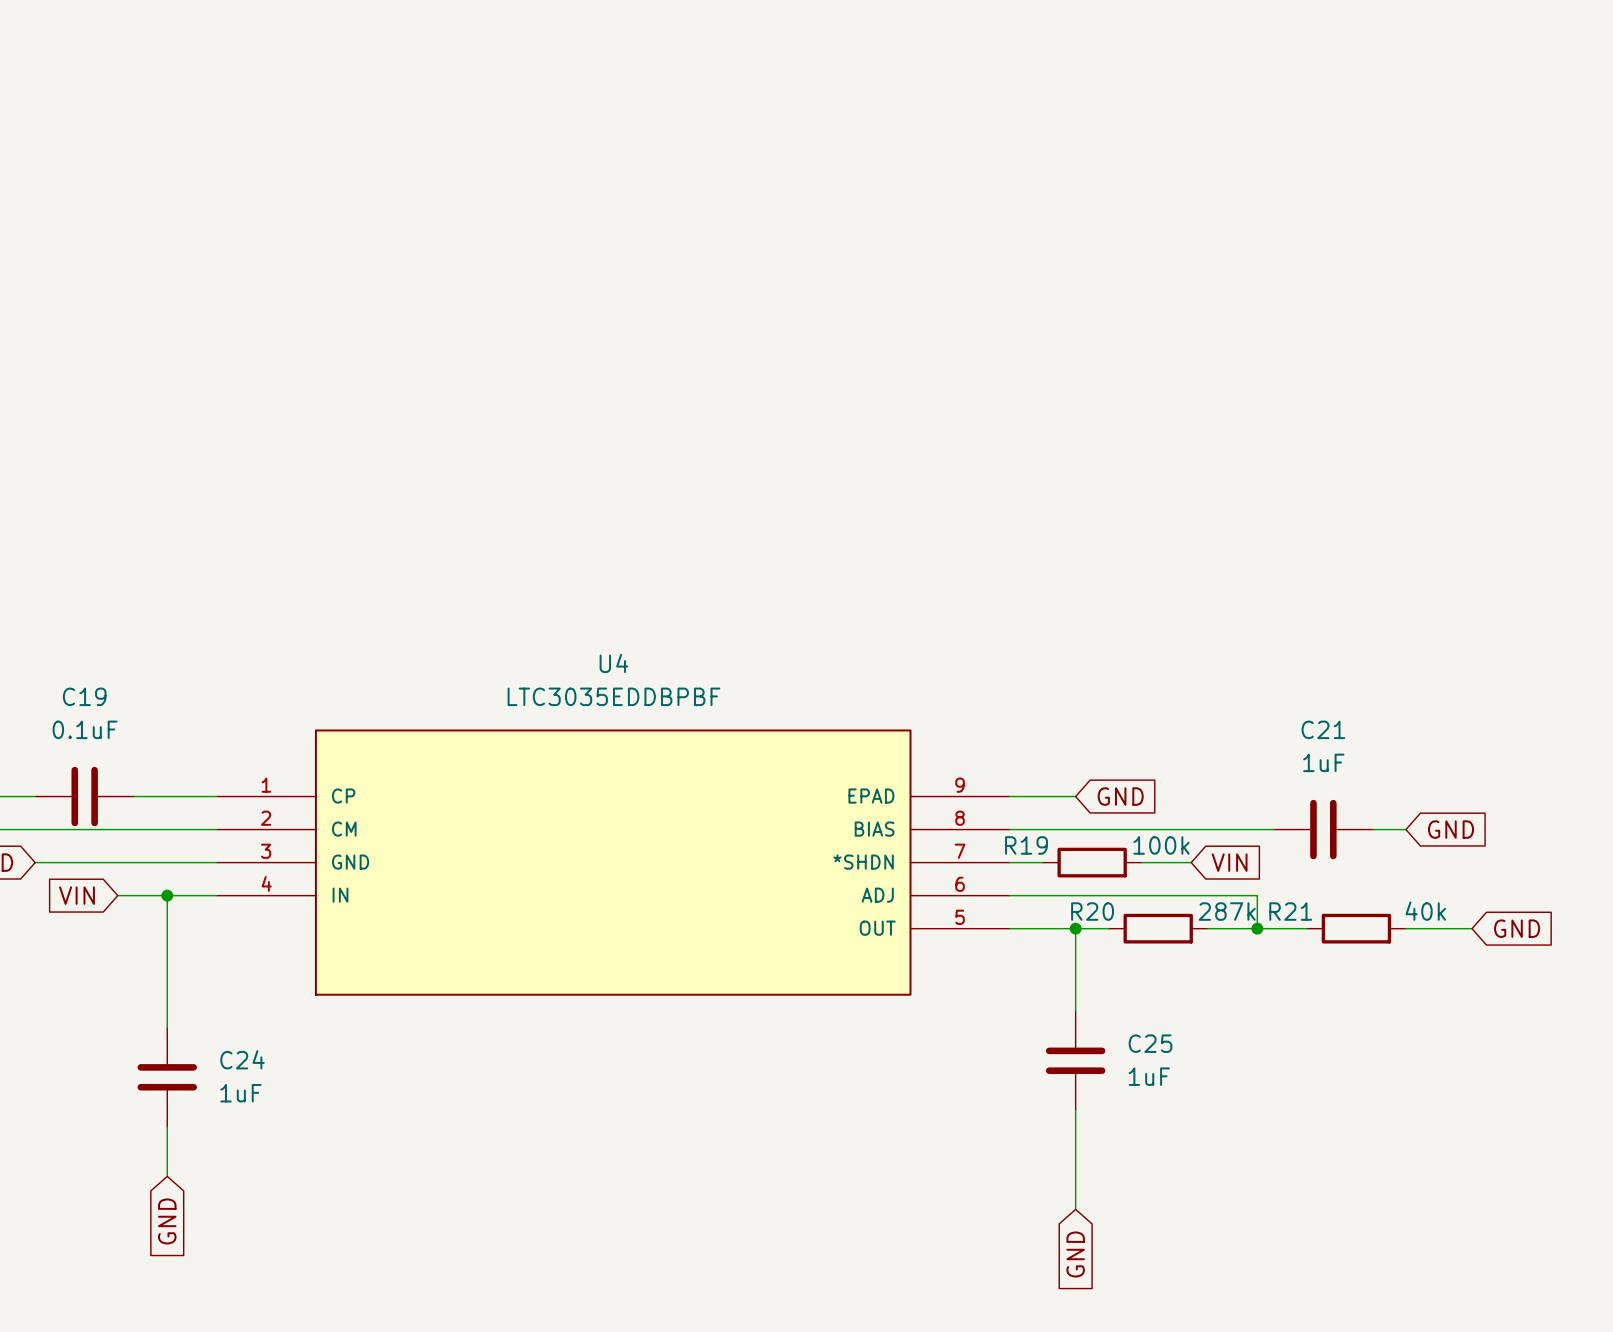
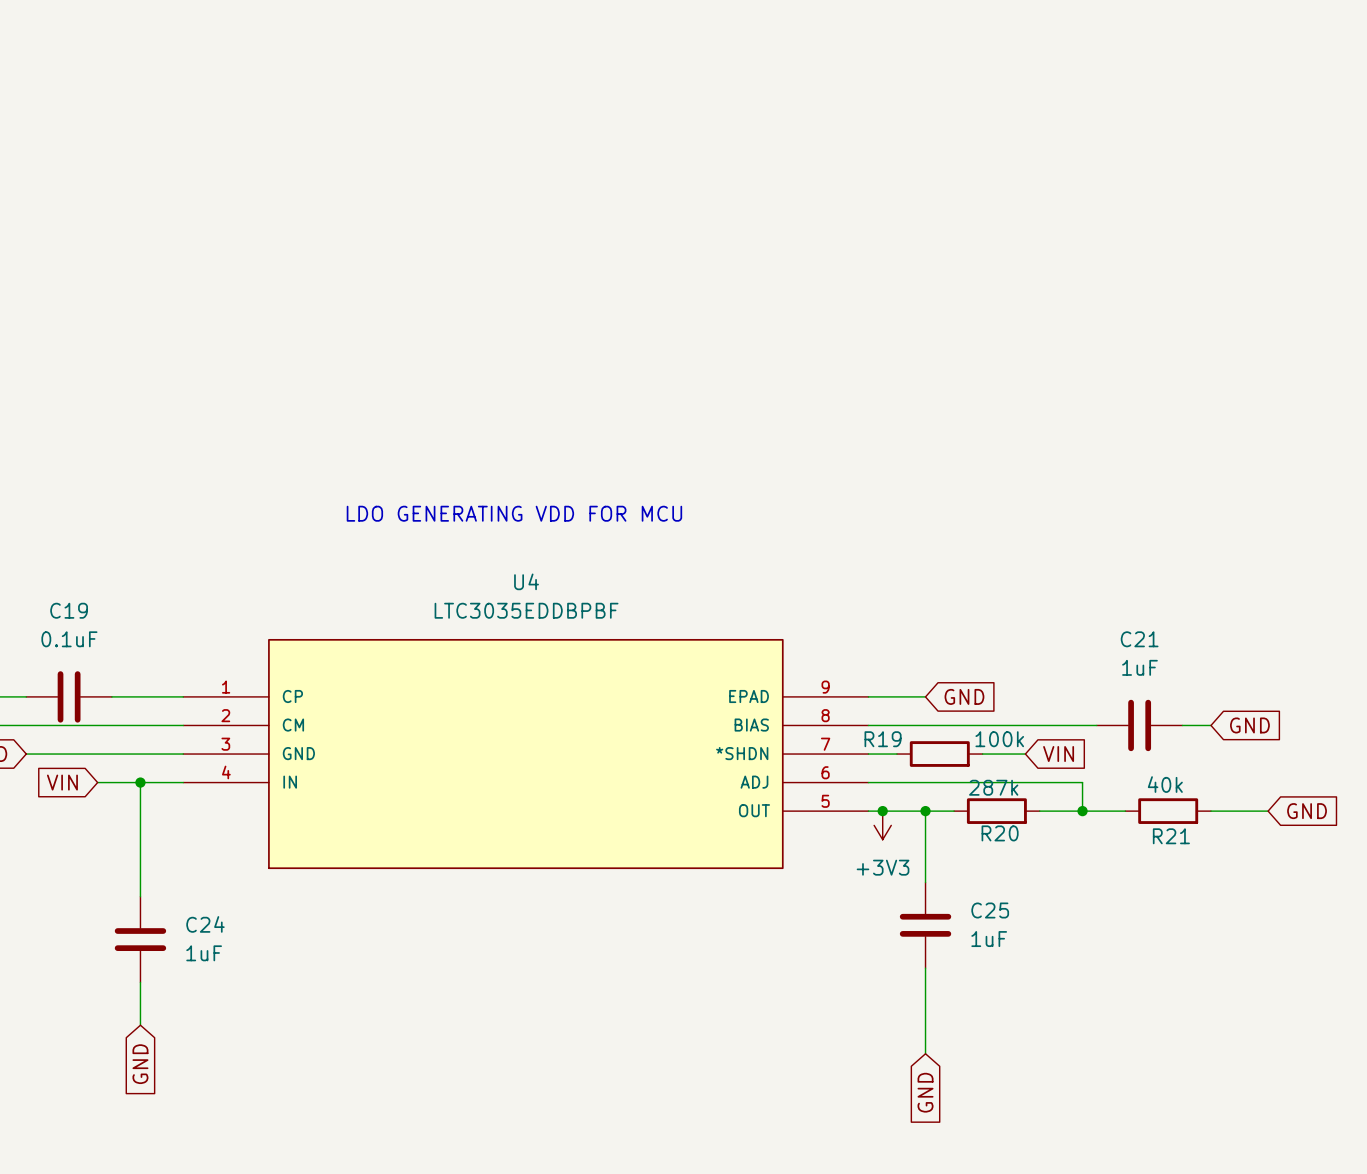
text: none -> LDO GENERATING VDD FOR MCU (514, 513)
R20 name position: R20 (1092, 911) -> R20 (1000, 833)
R20 value position: 287k (1227, 911) -> 287k (993, 787)
R21 name position: R21 (1290, 911) -> R21 (1171, 836)
R21 value position: 40k (1425, 911) -> 40k (1165, 784)
junction: none -> (882, 811)
power symbol: none -> +3V3 (882, 825)

